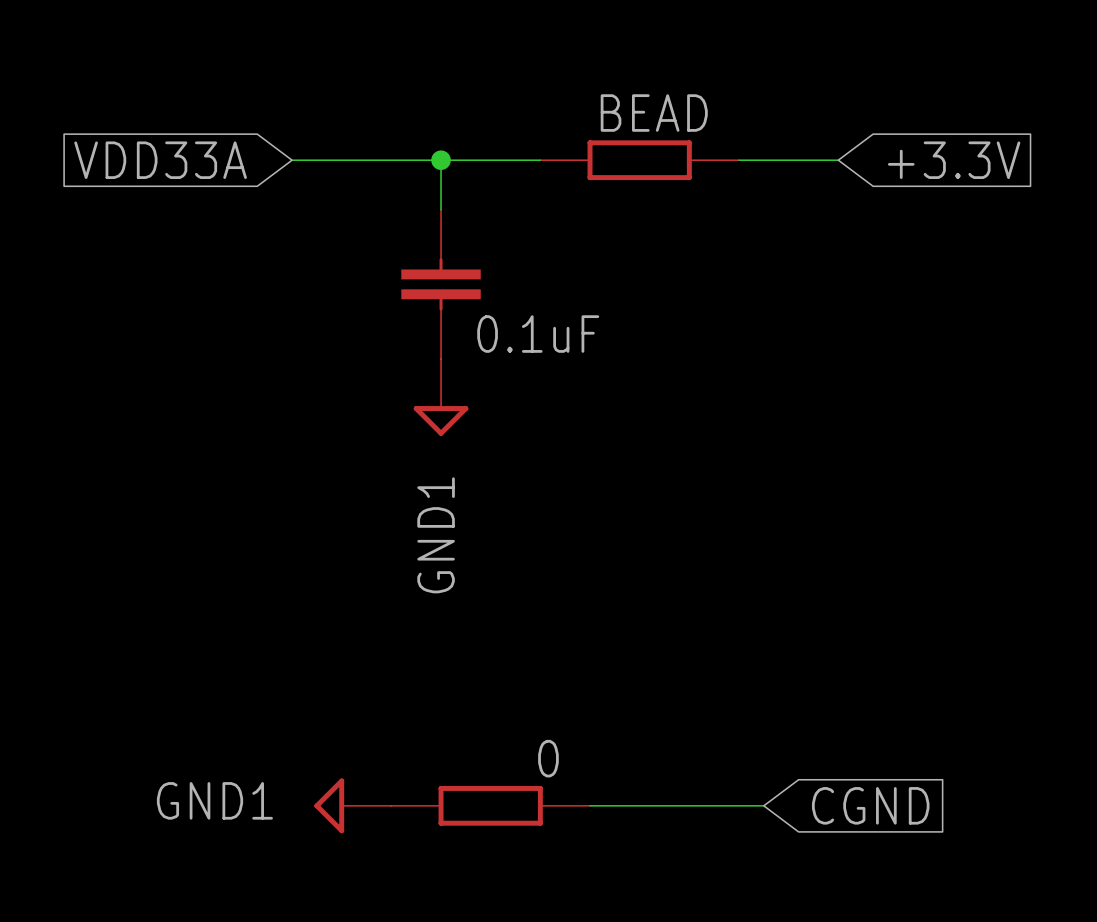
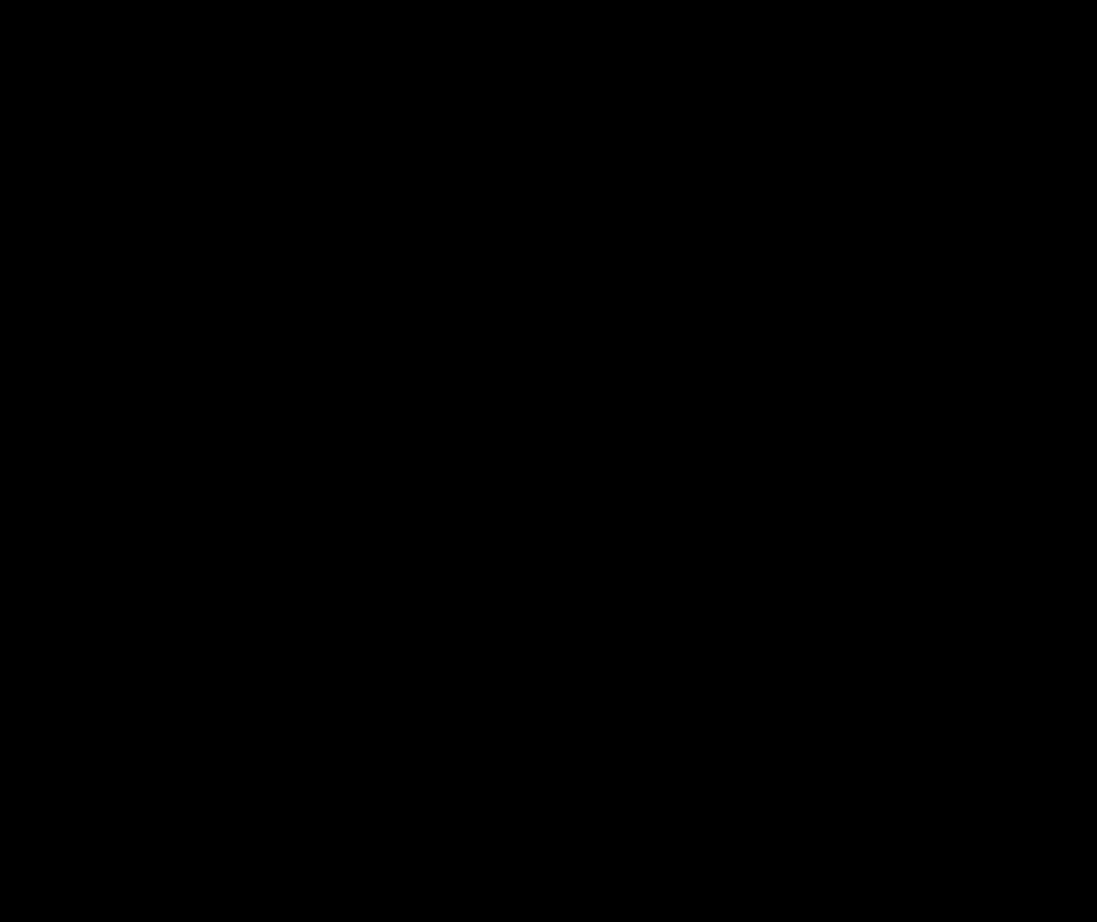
global label: VDD33A (160, 160) -> none
wire: (292, 160) (540, 160) -> none
wire: (441, 160) (441, 209) -> none
junction: (441, 160) -> none
part: BEAD (639, 160) -> none
wire: (739, 160) (838, 160) -> none
global label: +3.3V (954, 160) -> none
part: 0.1uF (441, 284) -> none
power symbol: GND1 (441, 397) -> none
power symbol: GND1 (352, 805) -> none
part: 0 (490, 805) -> none
wire: (590, 805) (763, 805) -> none
global label: CGND (870, 805) -> none

